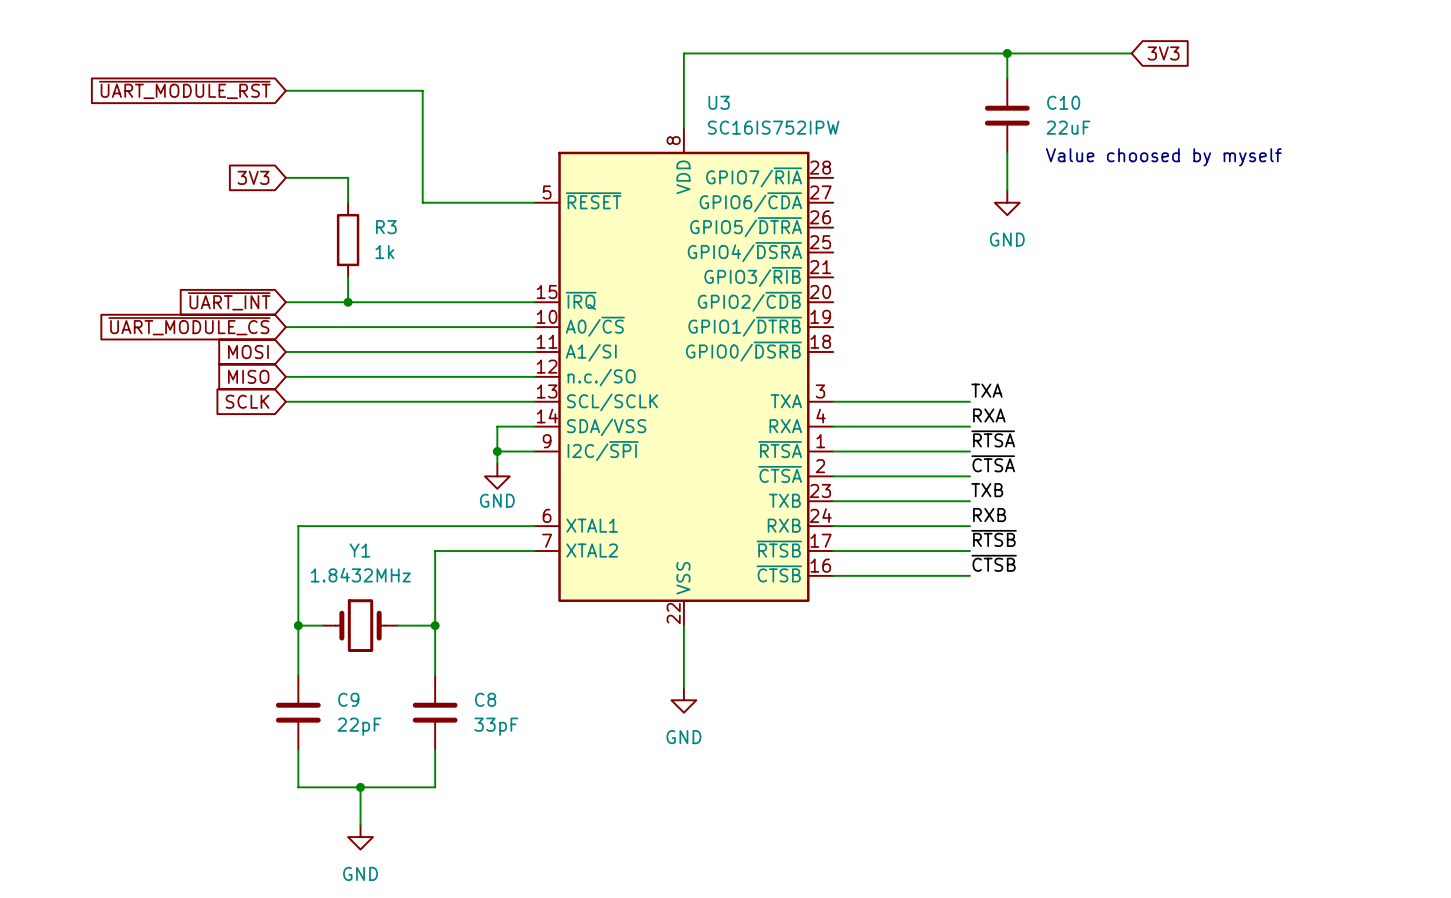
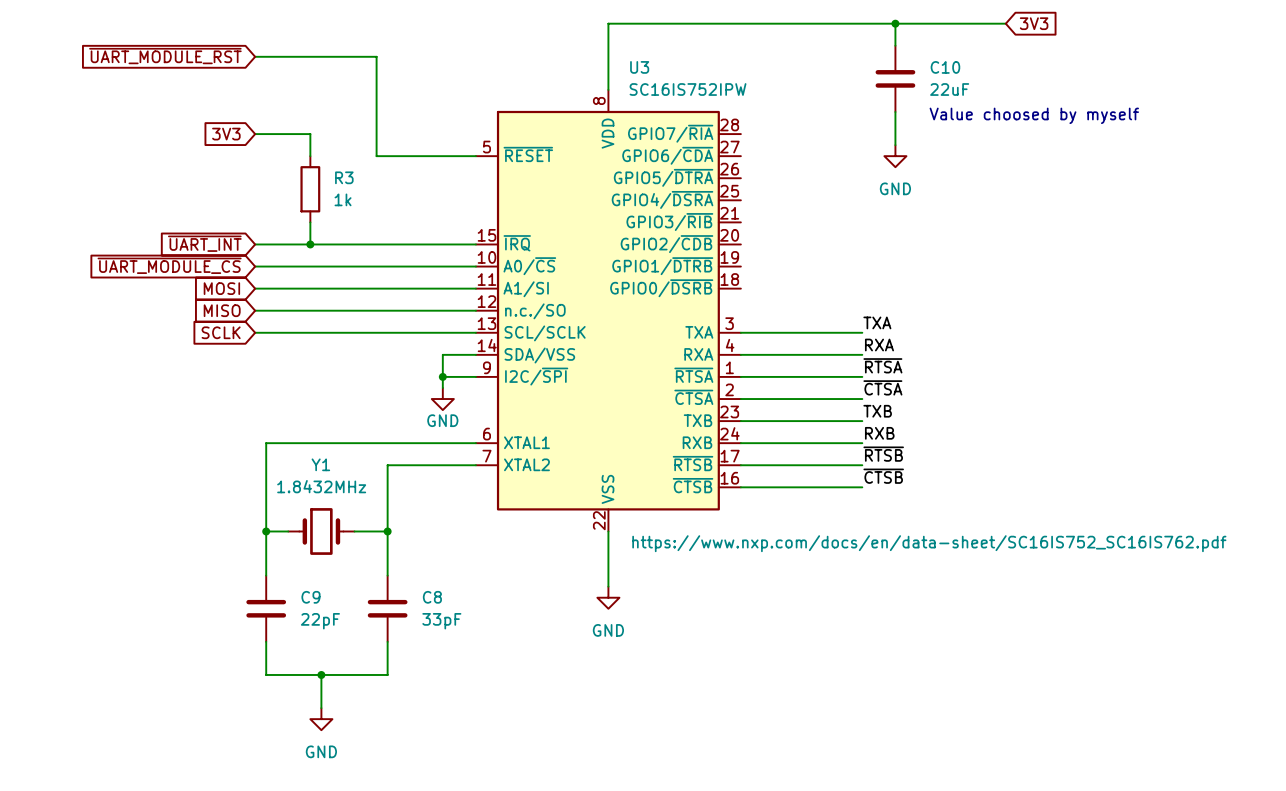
U3 text: none -> https://www.nxp.com/docs/en/data-sheet/SC16IS752_SC16IS762.pdf (929, 543)

